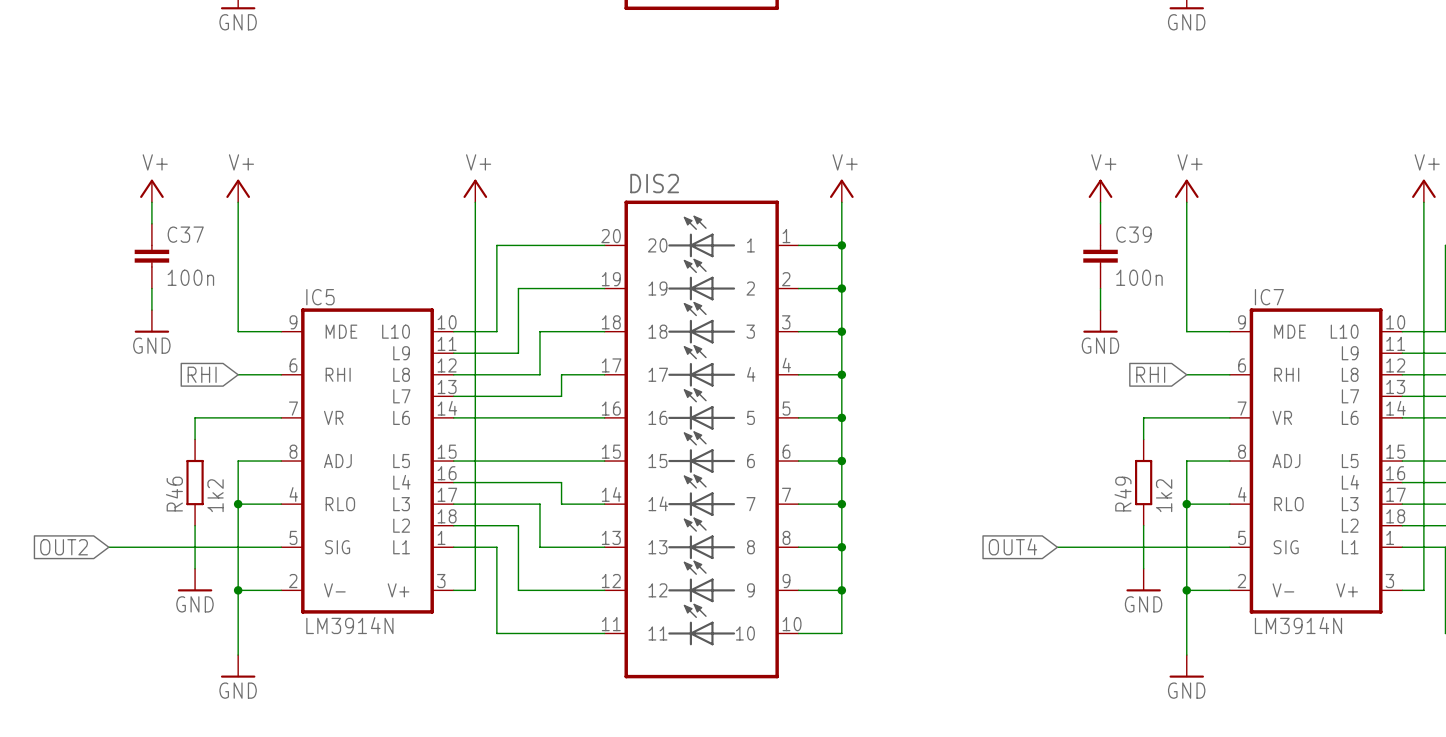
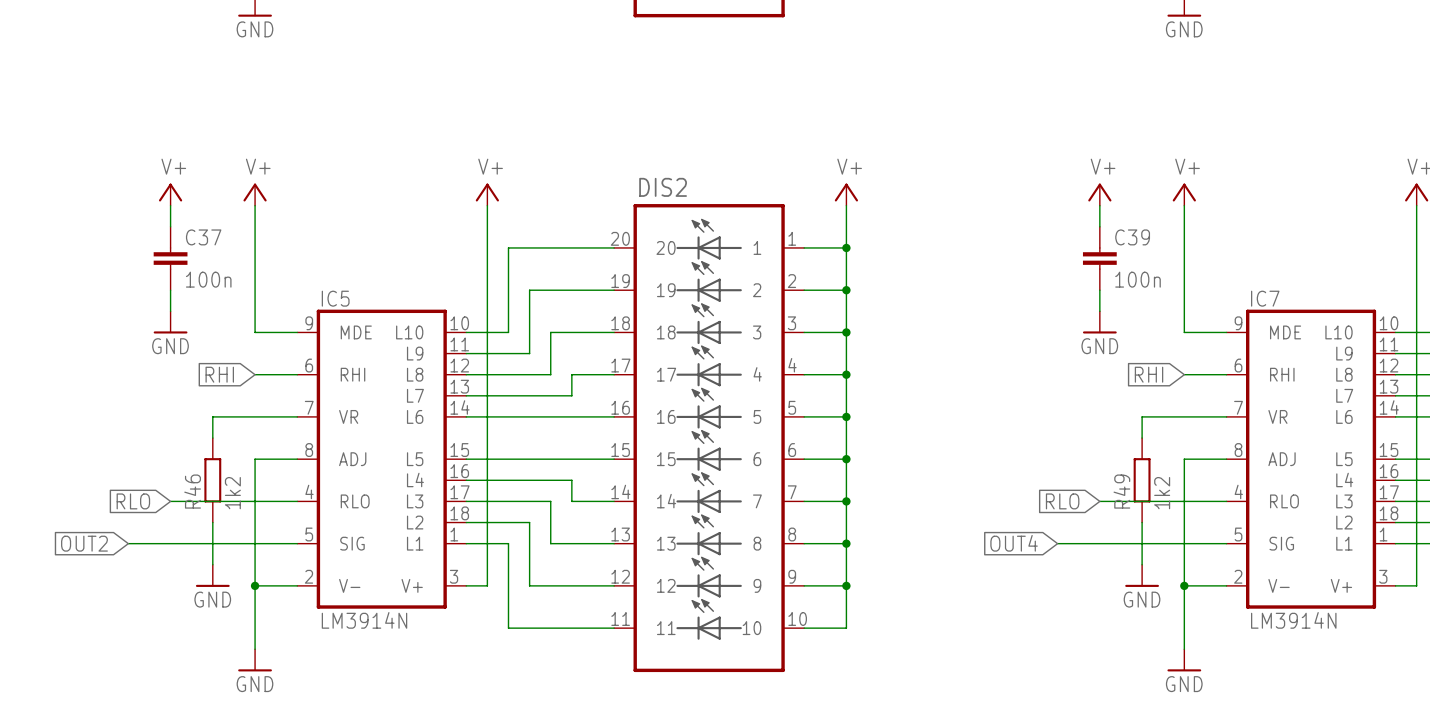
global label: none -> RLO (133, 501)
wire: none -> (170, 501) (255, 501)
junction: (238, 504) -> none
global label: none -> RLO (1062, 501)
wire: none -> (1099, 501) (1184, 501)
junction: (1186, 504) -> none

